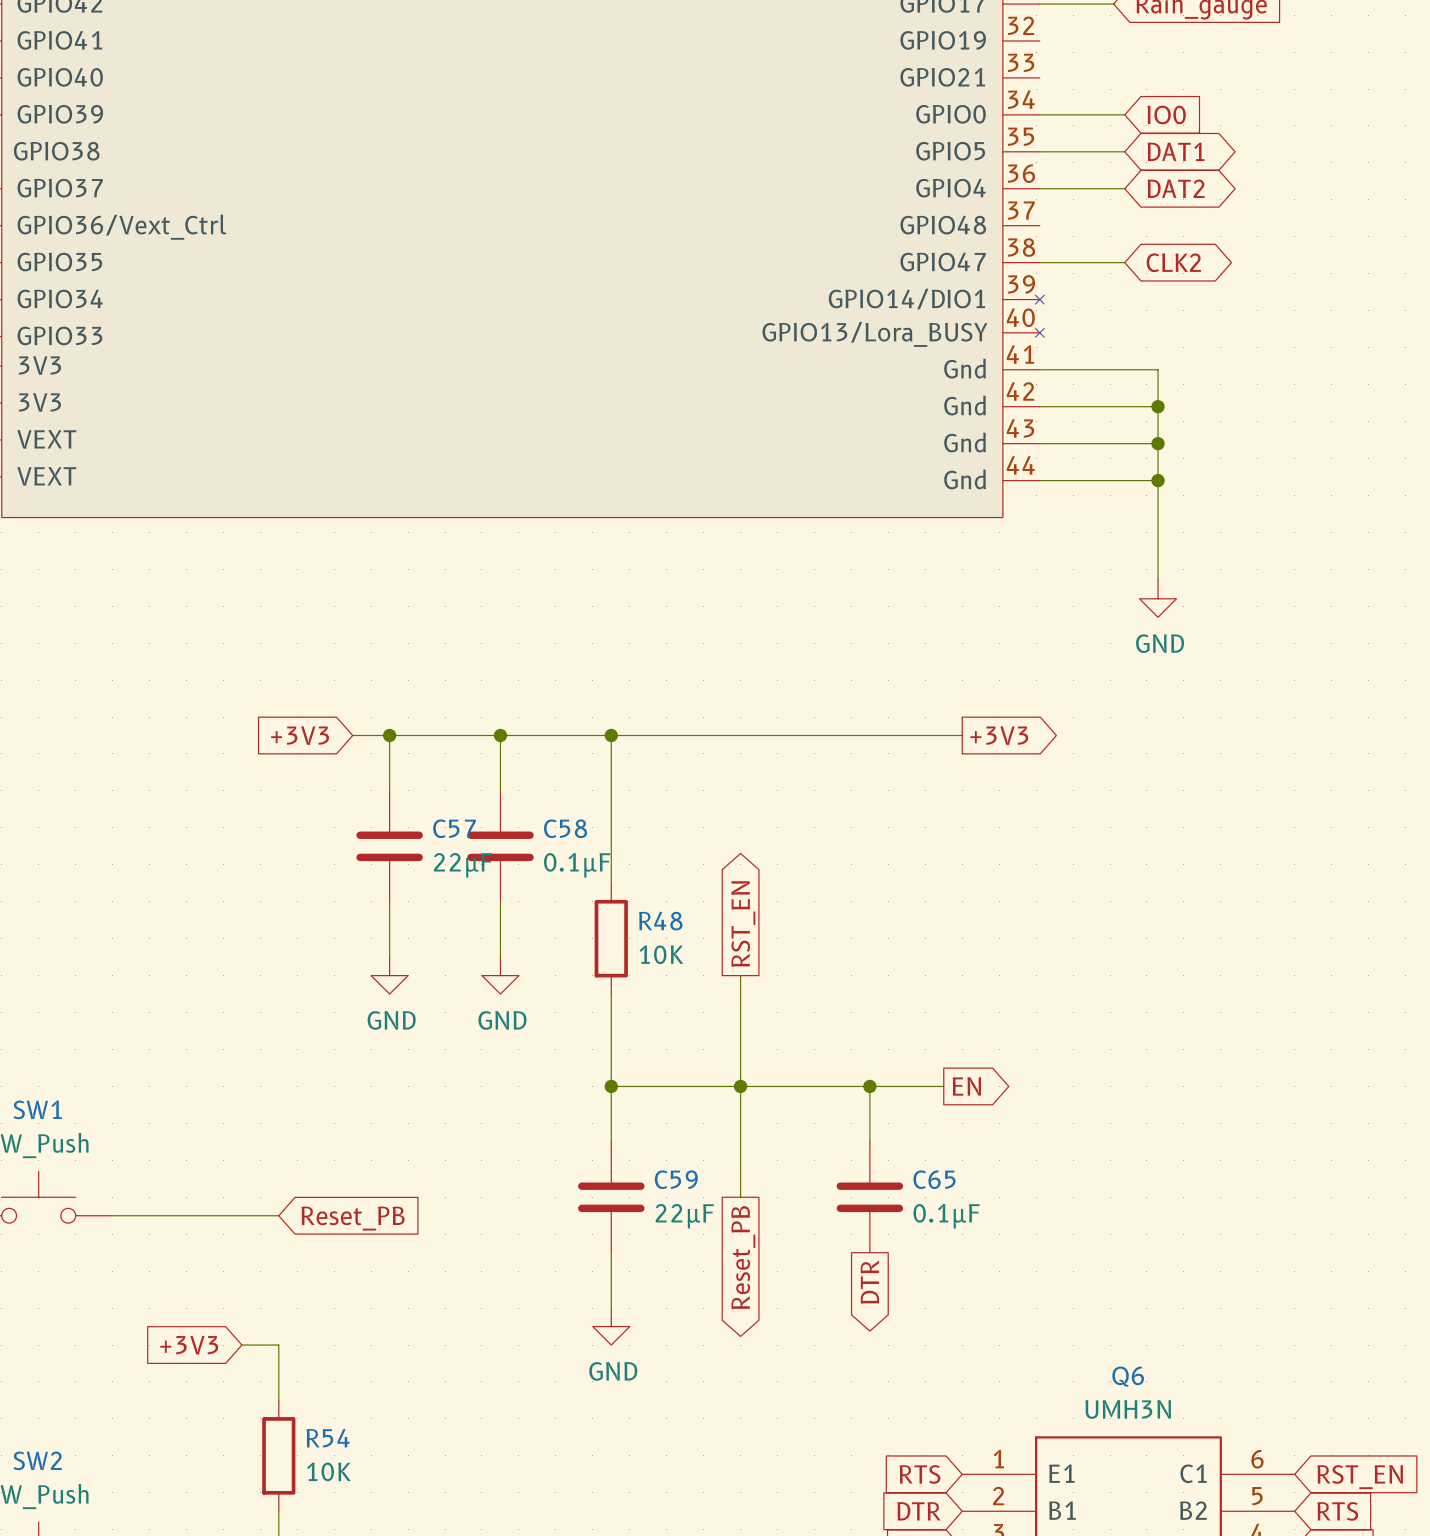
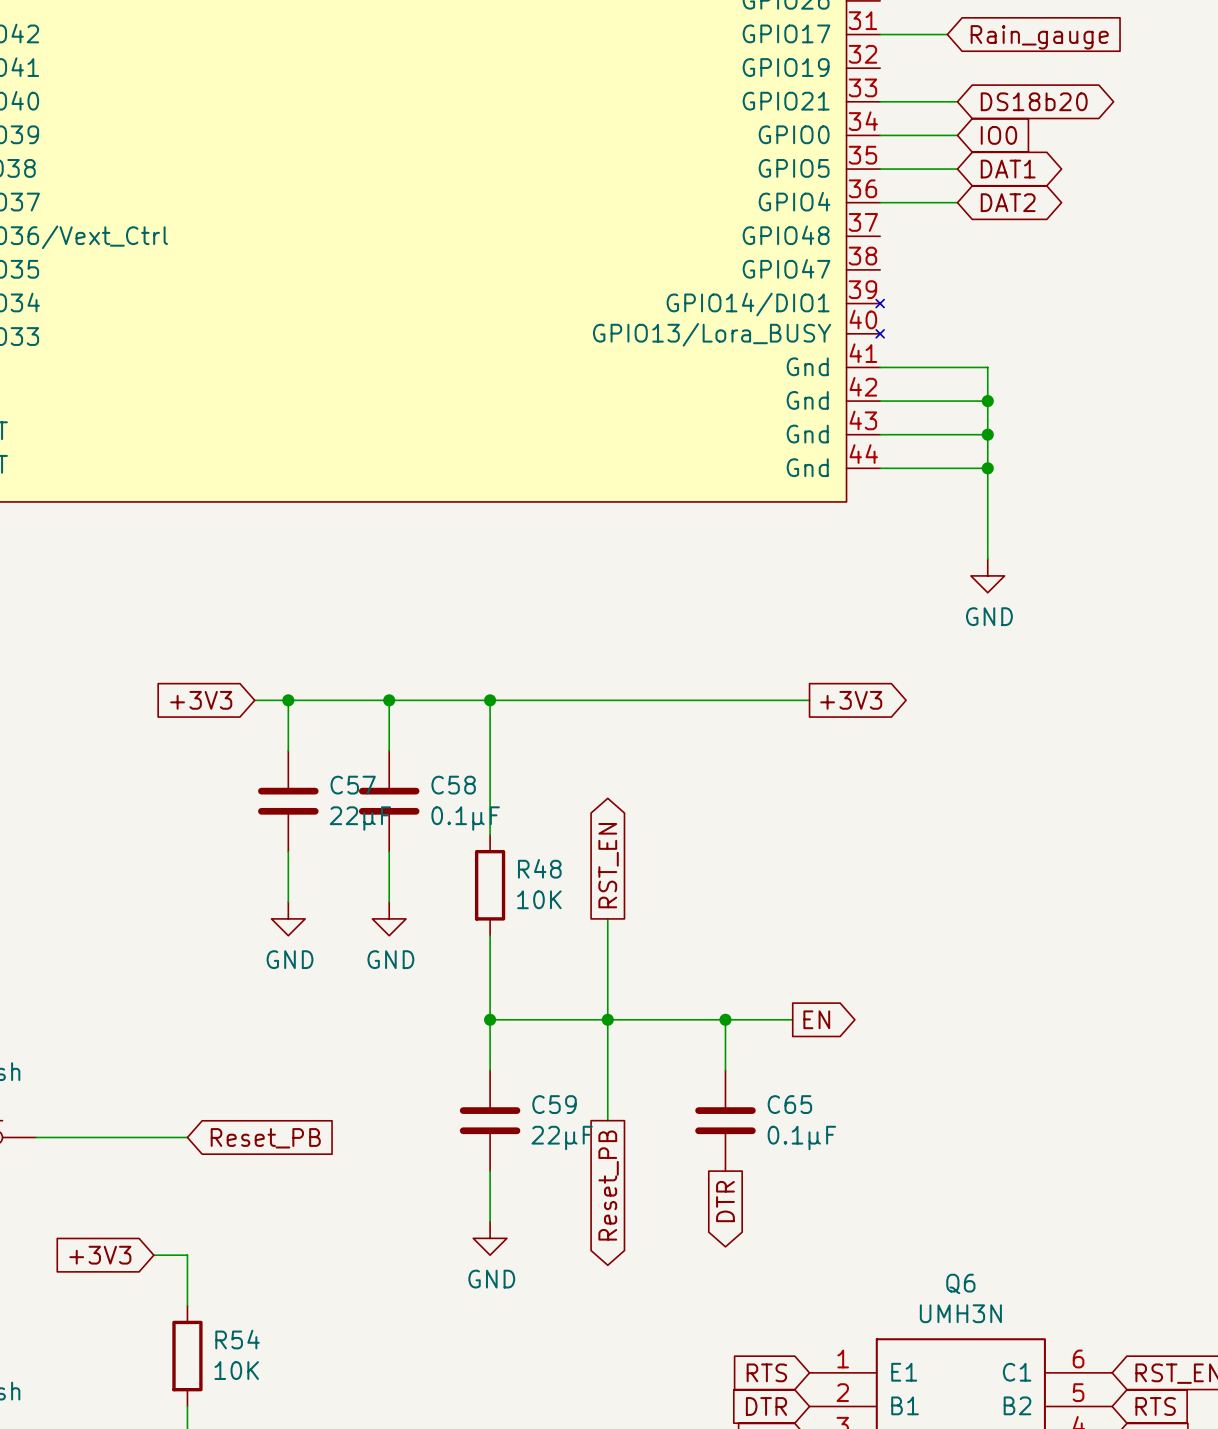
global label: none -> DS18b20 (1034, 101)
wire: (1039, 262) (1124, 262) -> (880, 101) (957, 101)
global label: CLK2 (1173, 262) -> none

